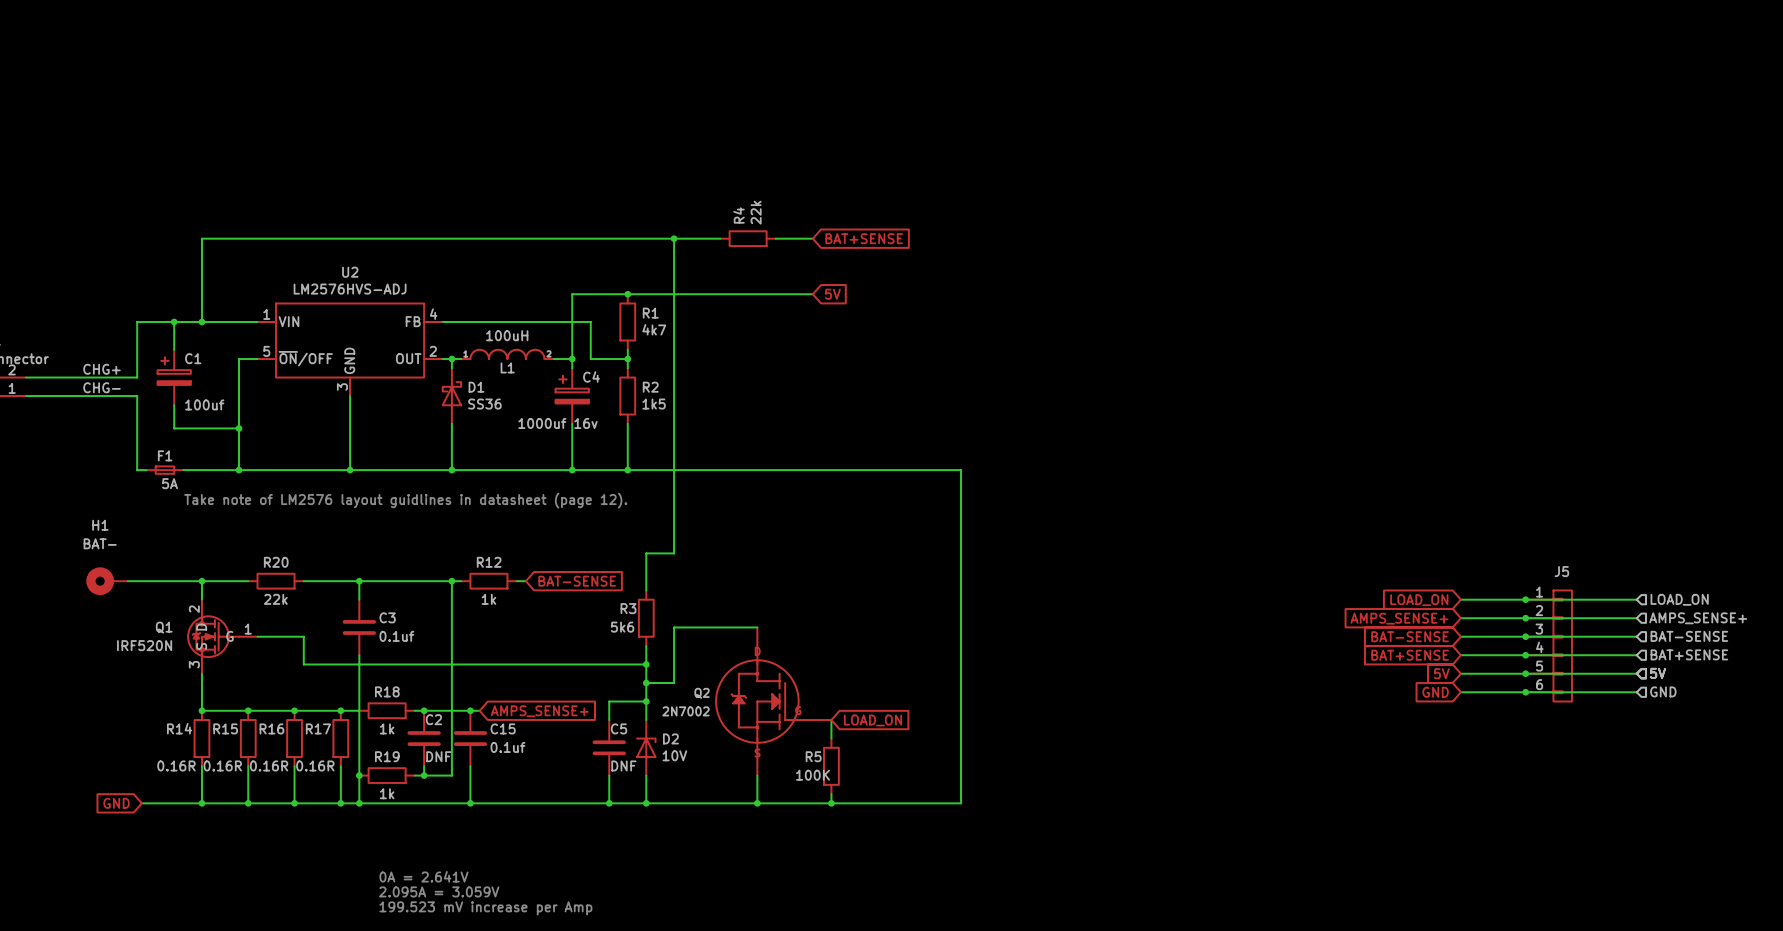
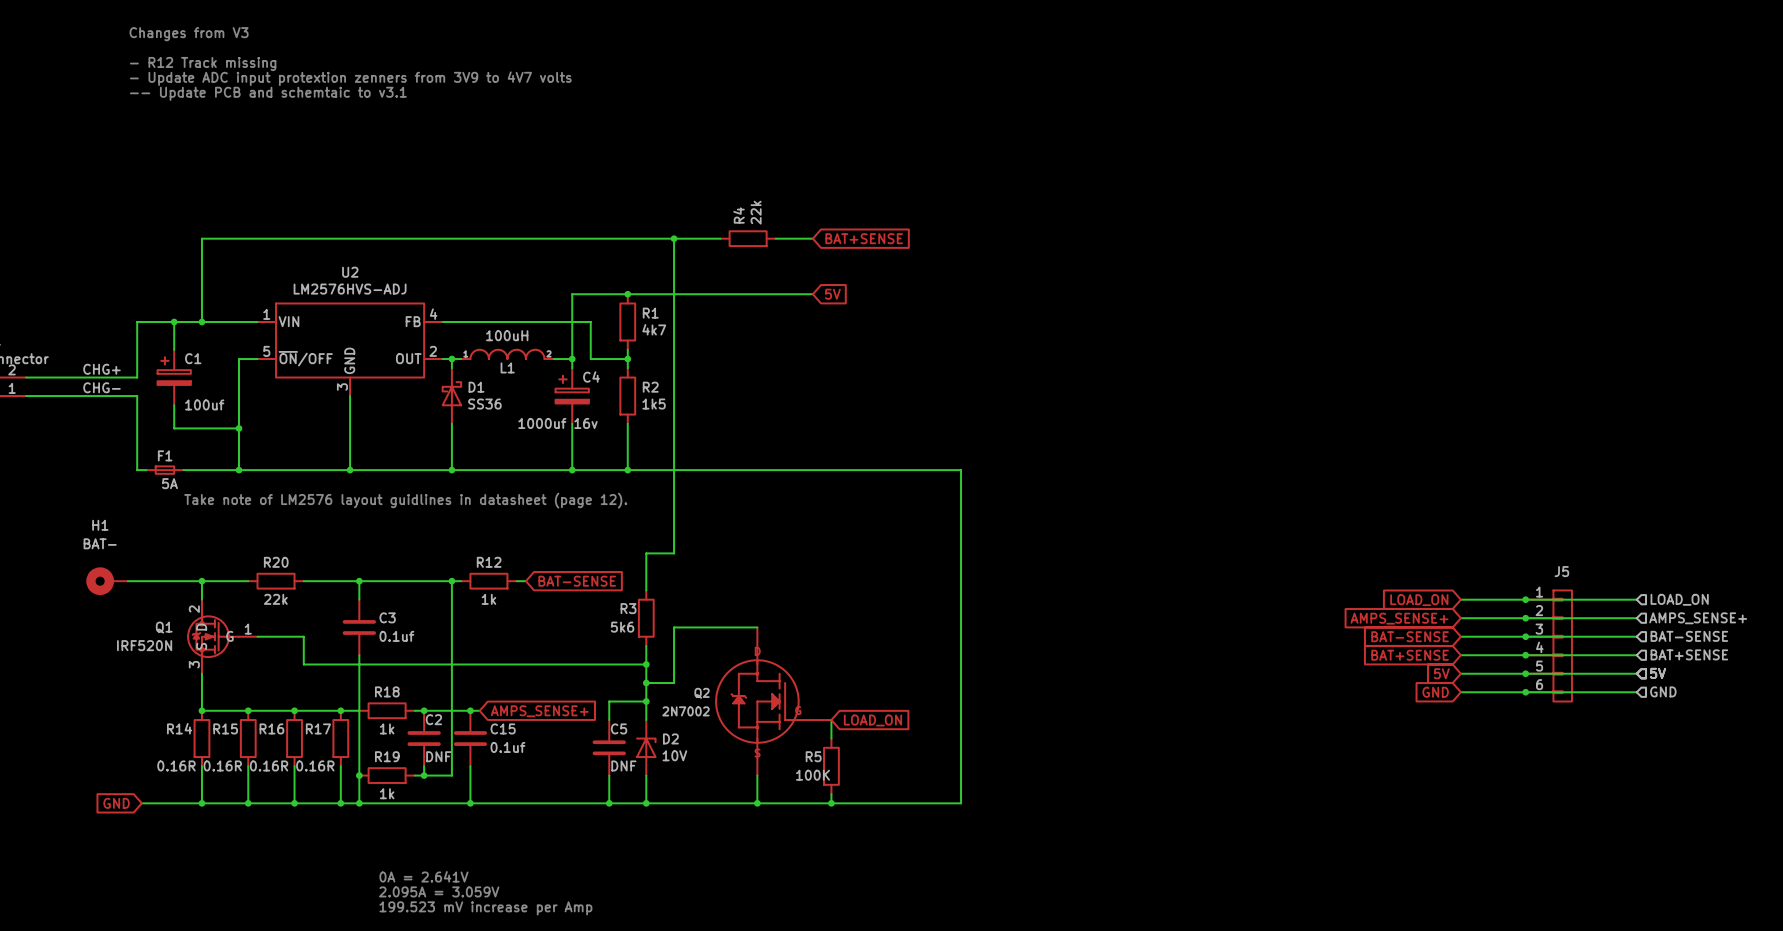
text: none -> Changes from V3 (189, 34)
text: none -> - R12 Track missing (203, 63)
text: none -> - Update ADC input protextion zenners from 3V9 to 4V7 volts (350, 78)
text: none -> -- Update PCB and schemtaic to v3.1 (268, 93)

